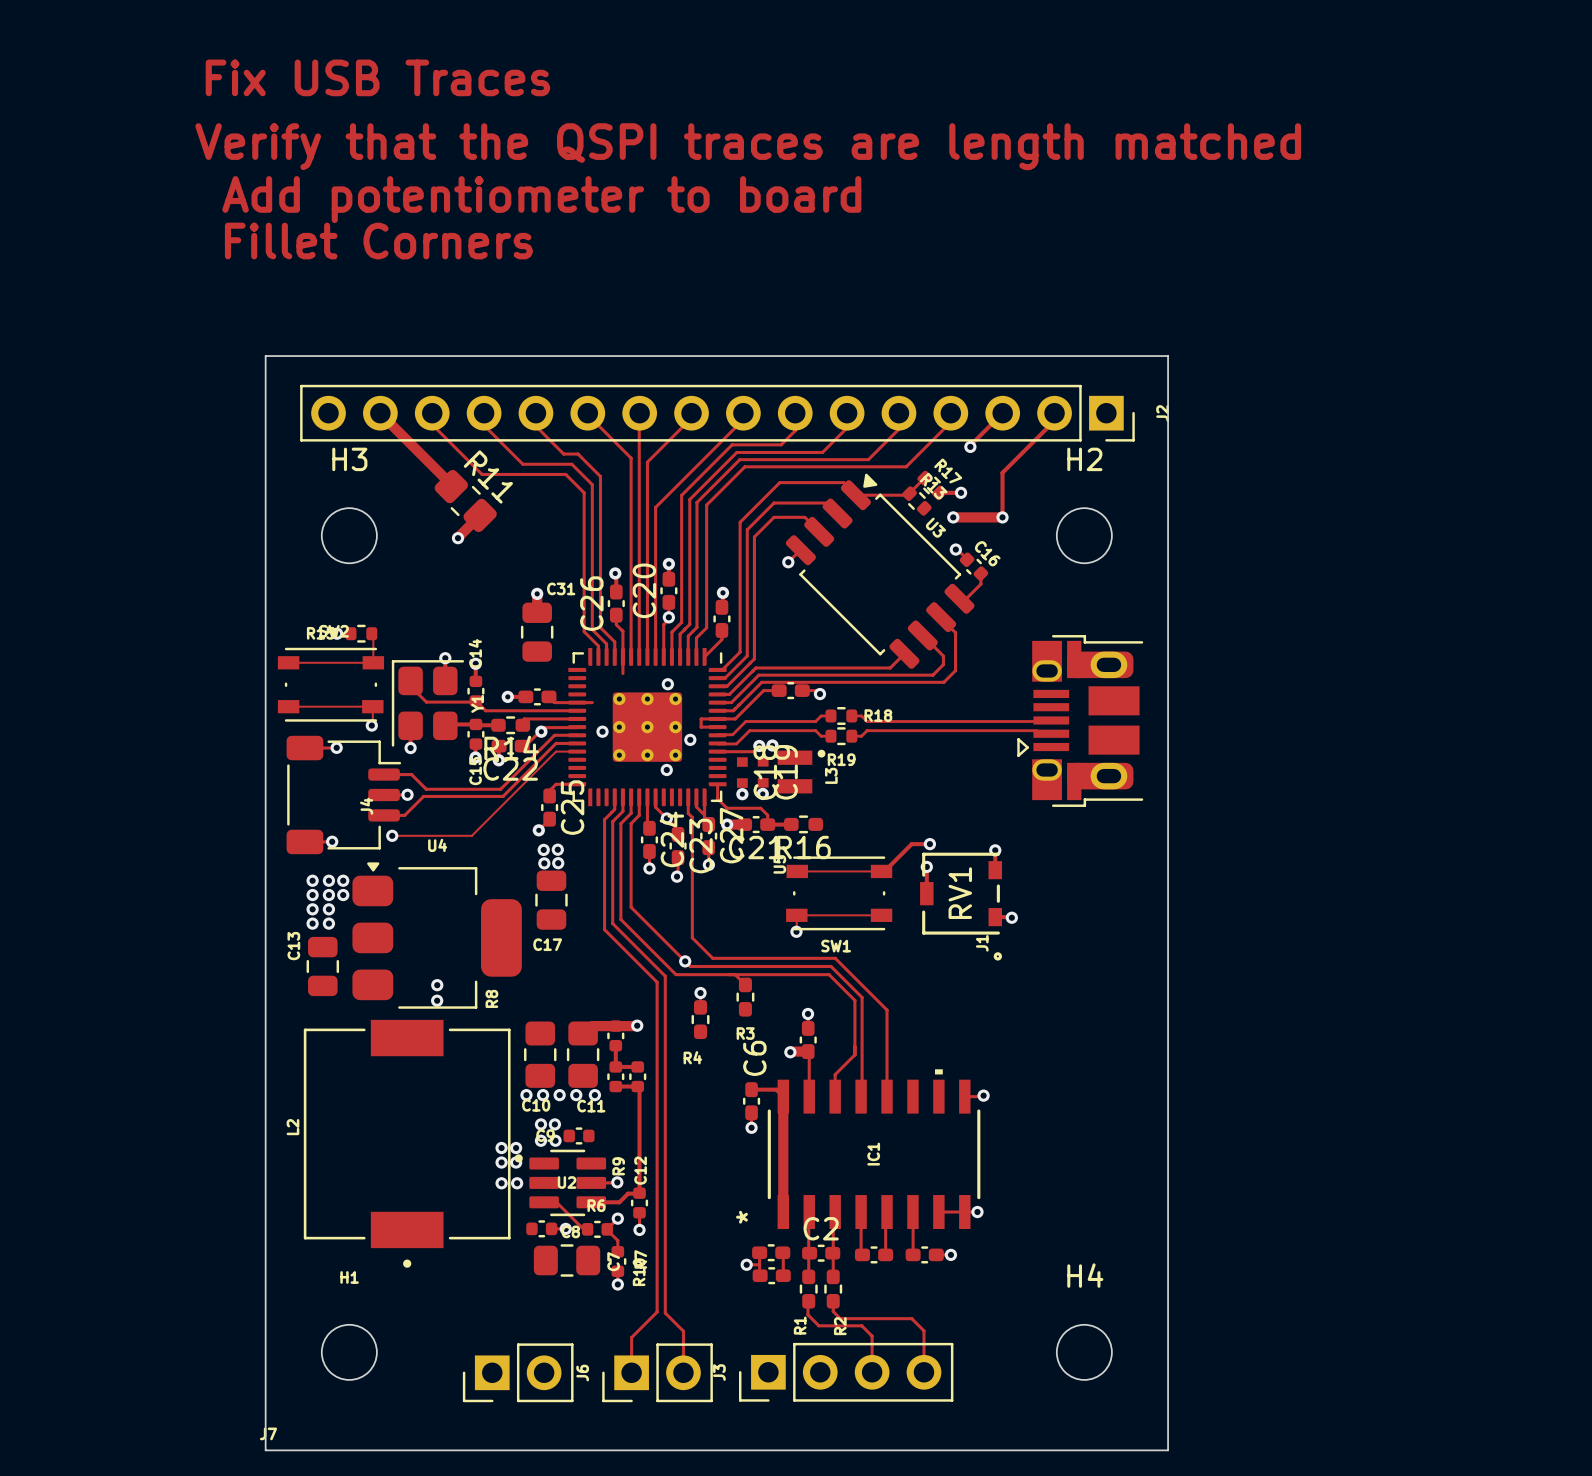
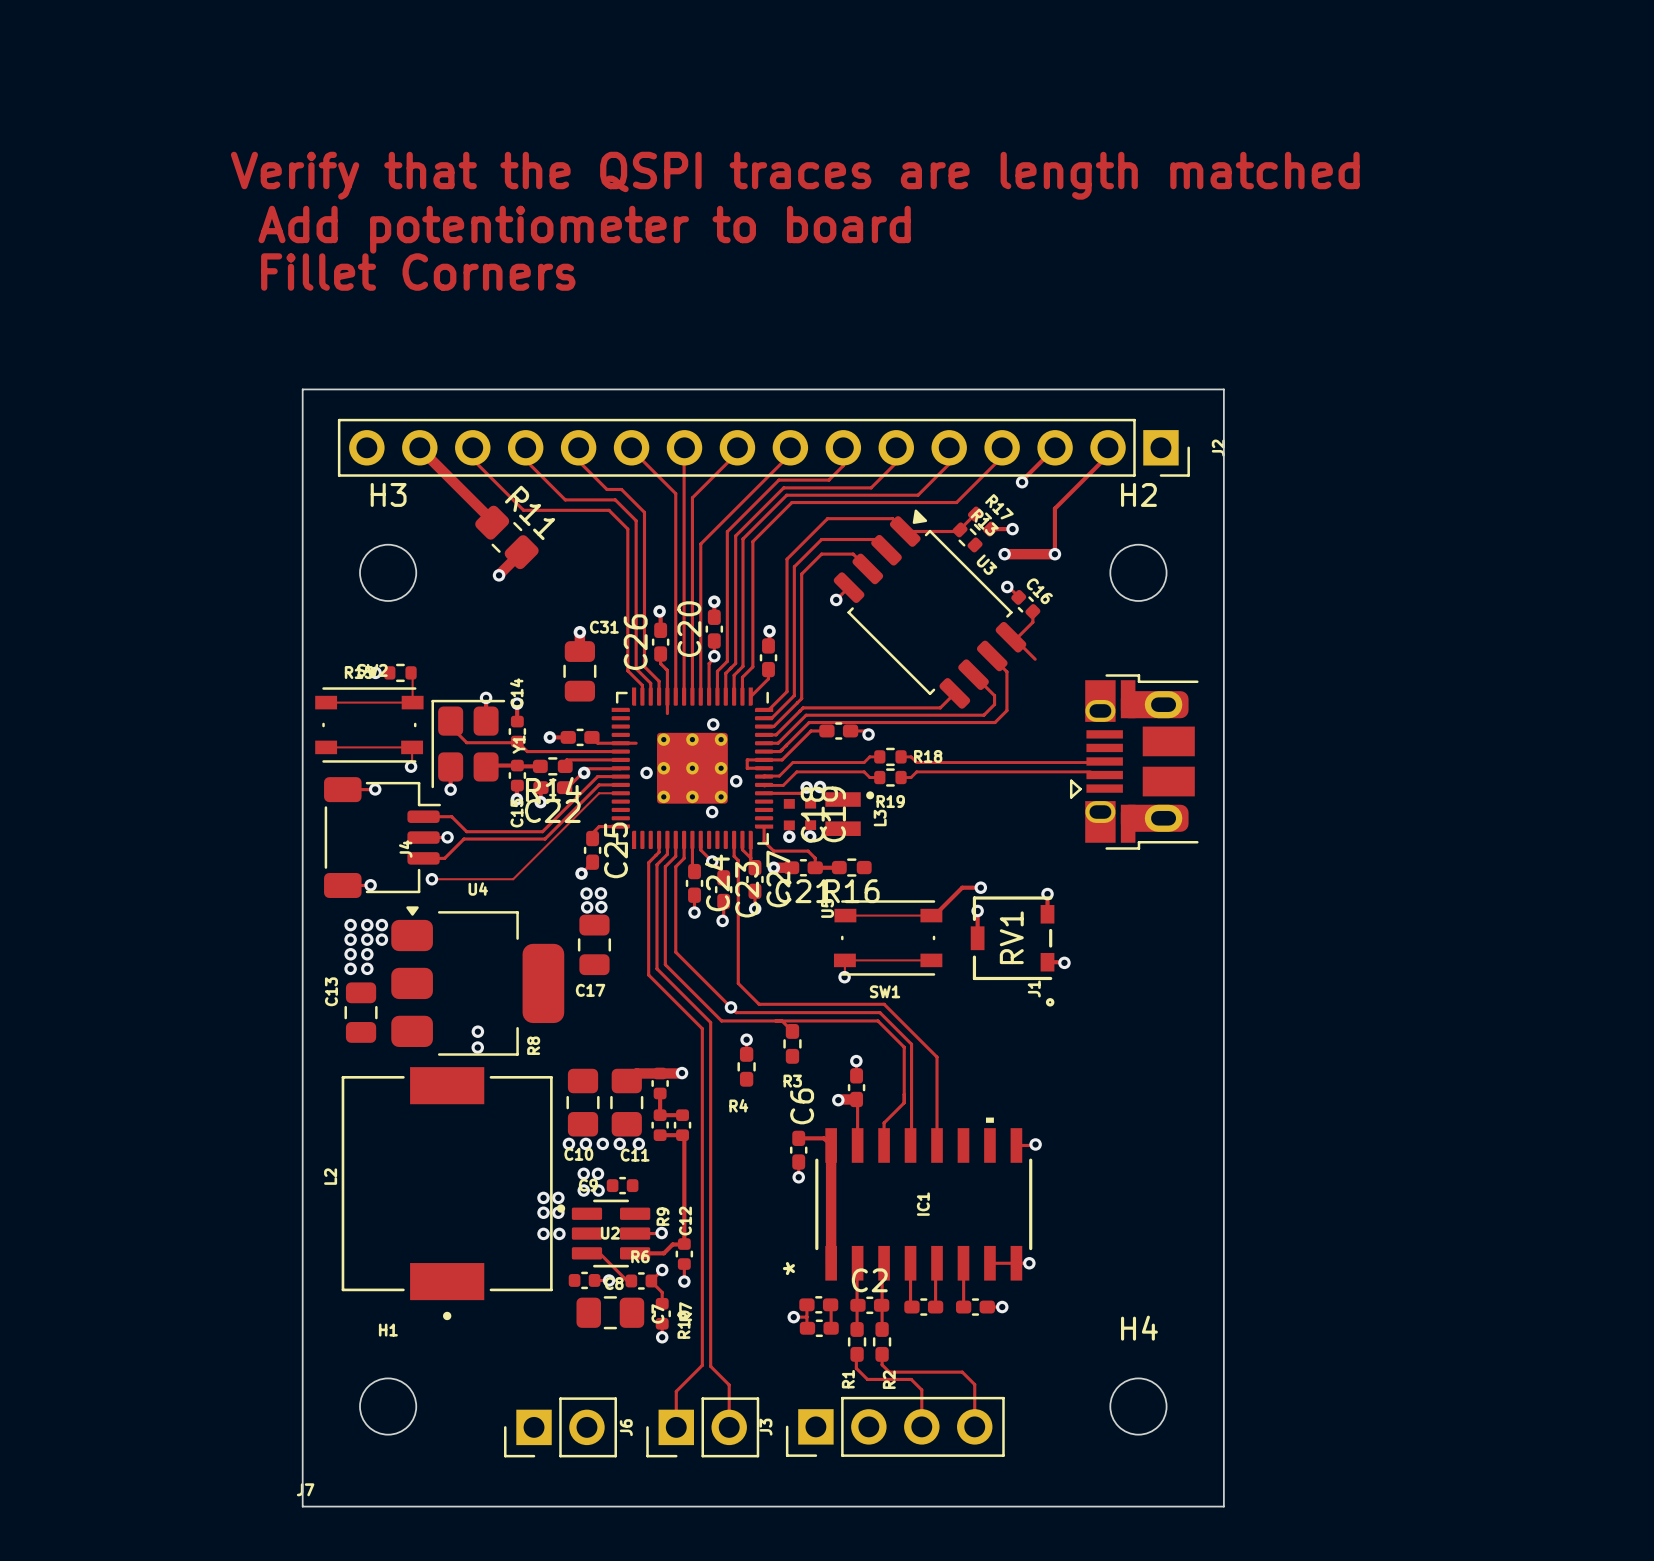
text: Fix USB Traces (377, 77) -> none
track: none -> (1013, 637) (1035, 659)

